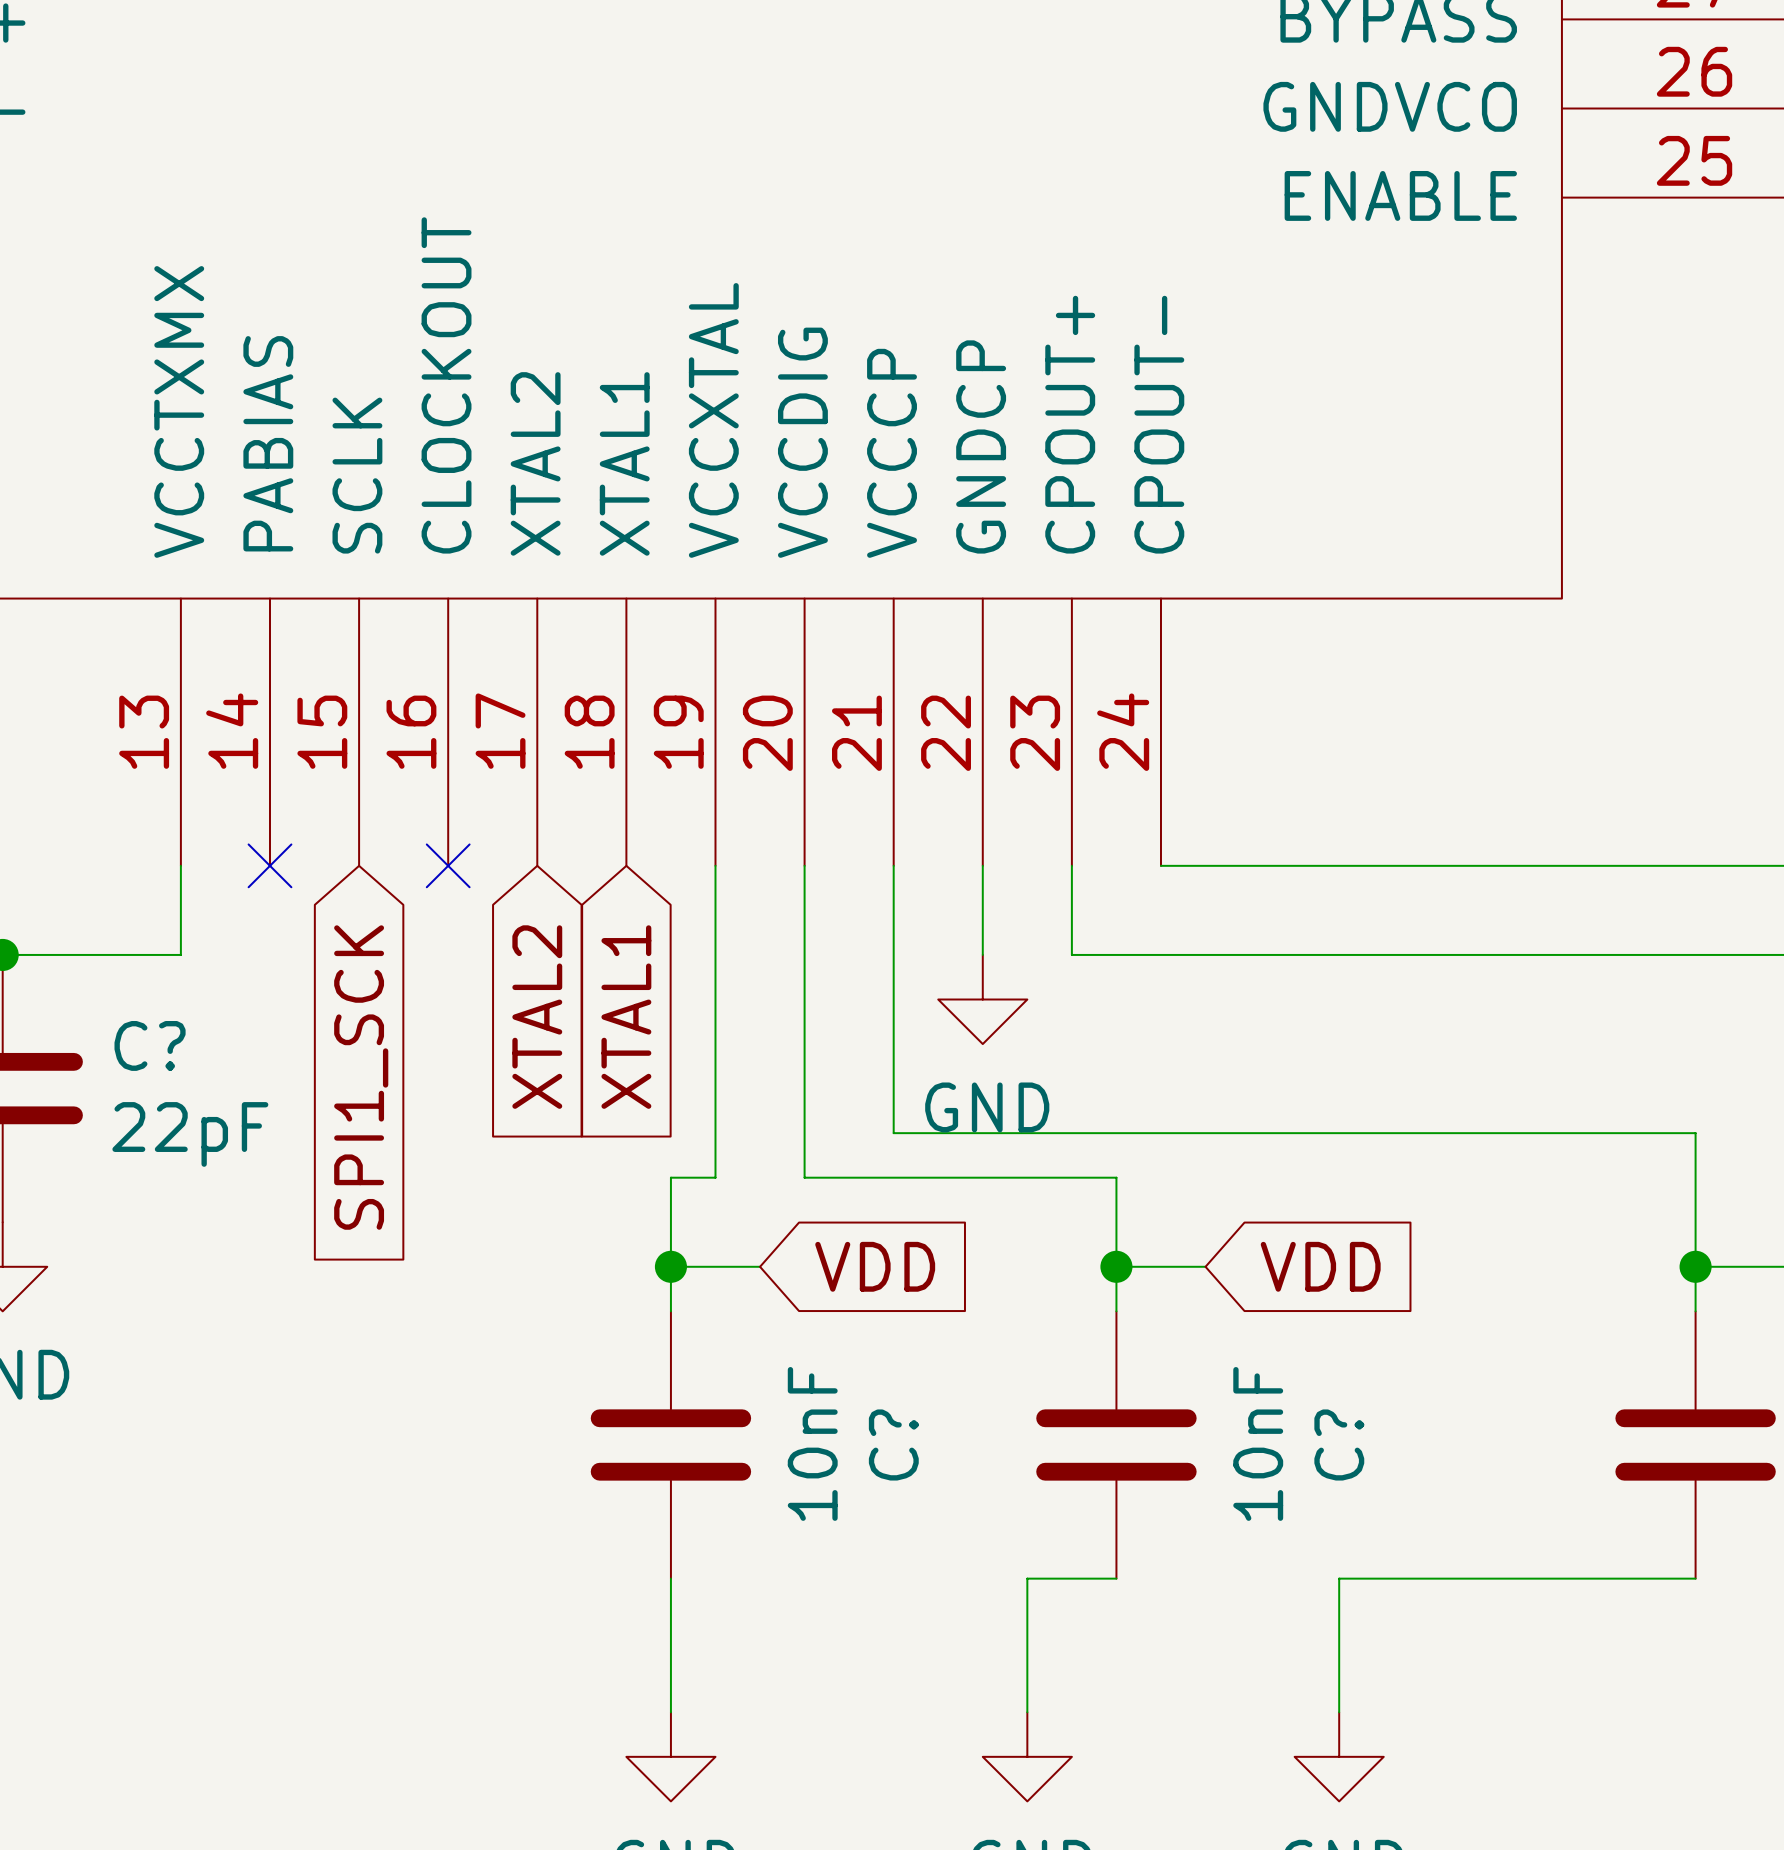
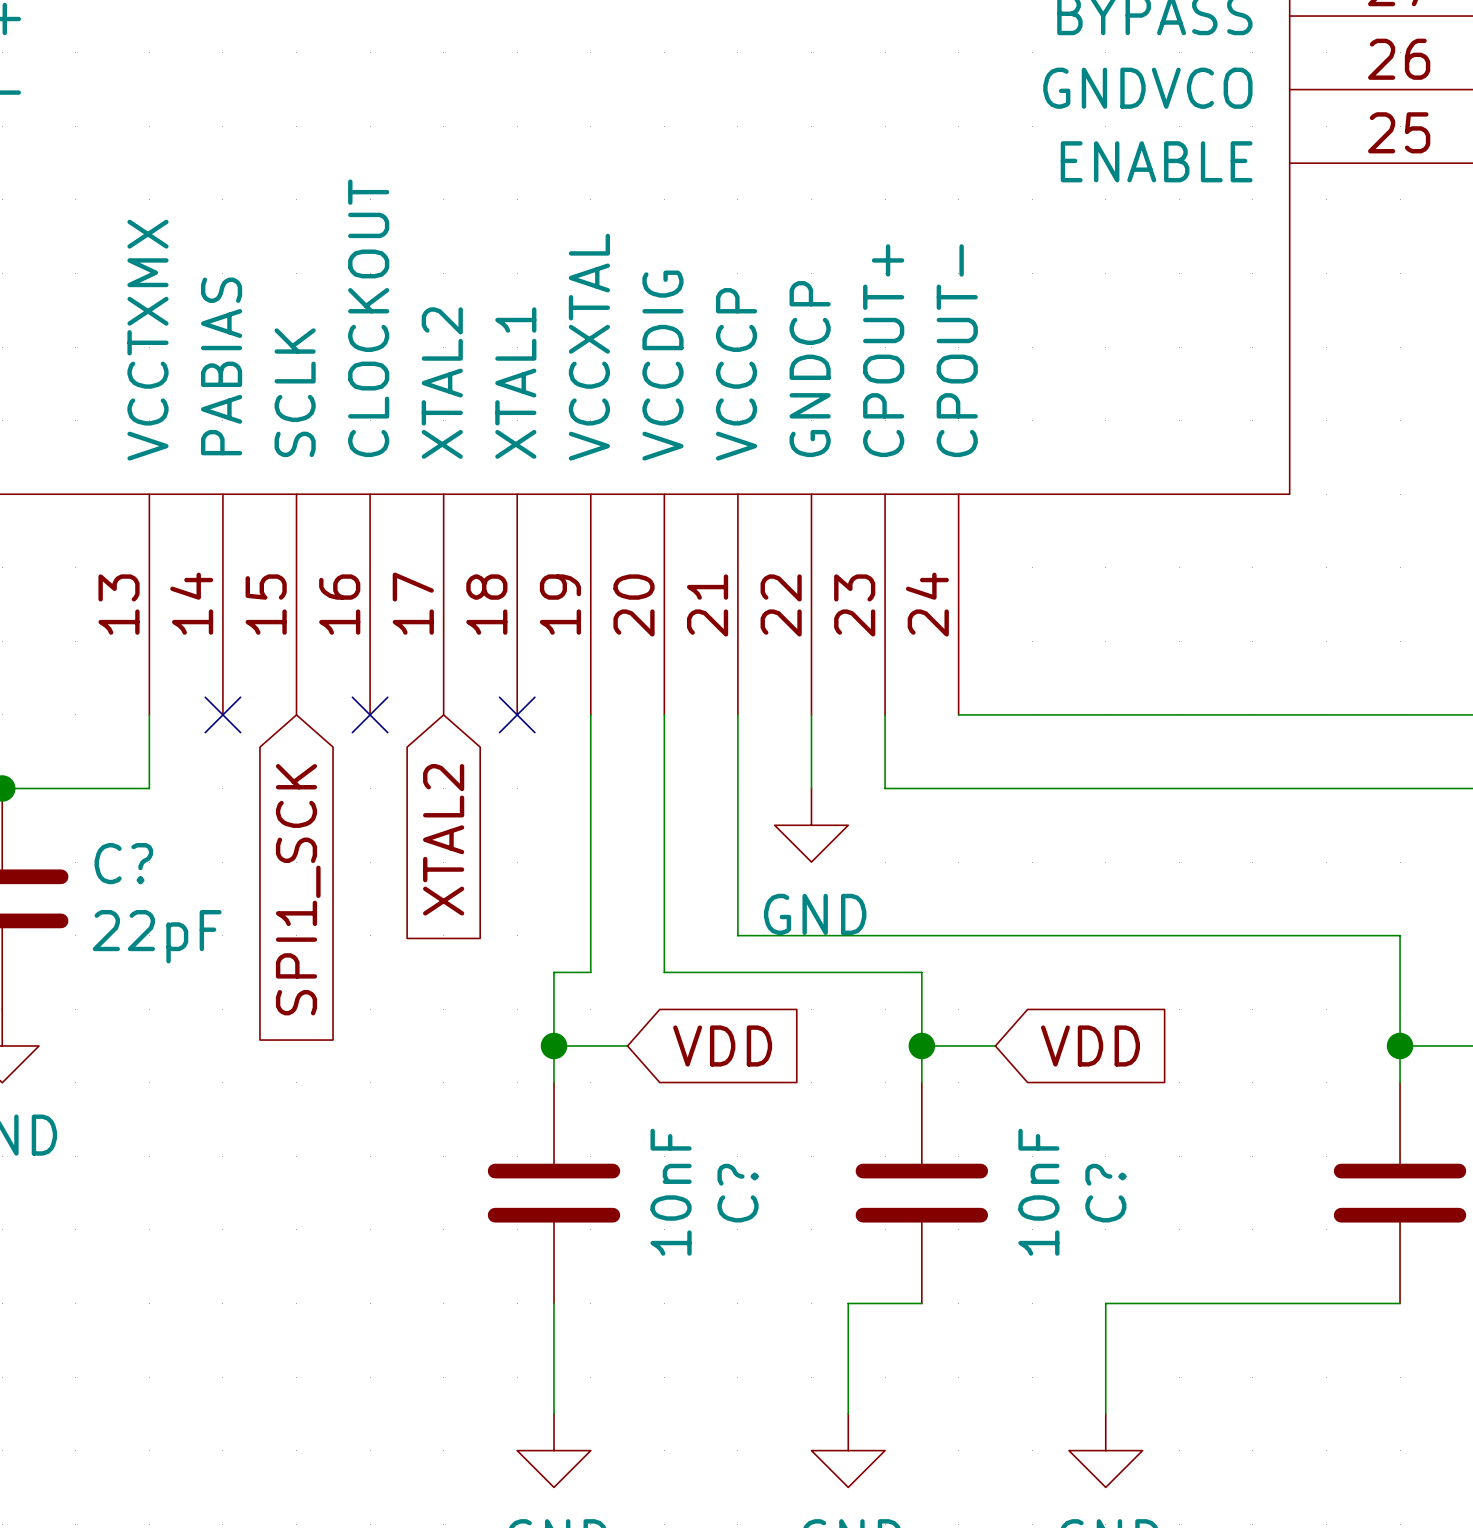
no-connect mark: none -> (517, 714)
global label: XTAL1 (626, 1017) -> none

